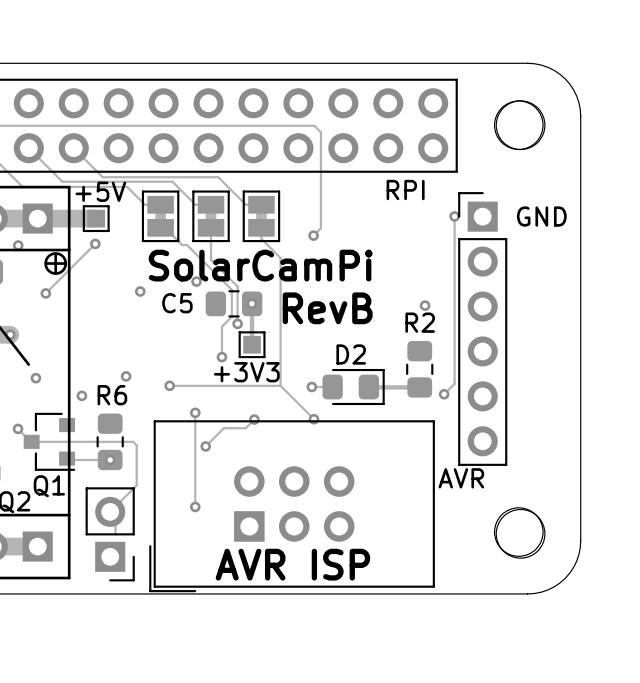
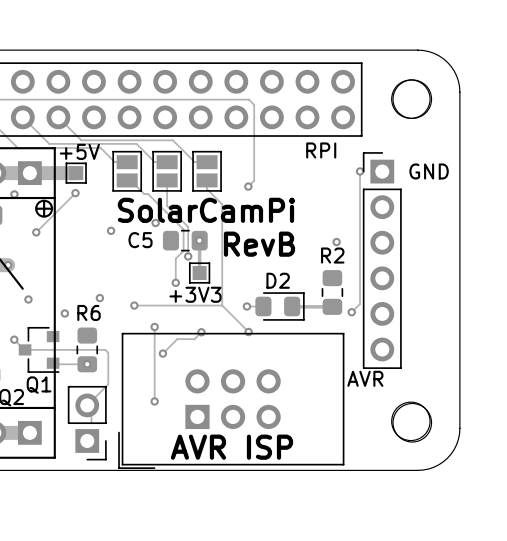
part footprint: [141, 190, 180, 243] -> [112, 150, 143, 192]
part footprint: [192, 190, 230, 243] -> [152, 150, 182, 192]
part footprint: [242, 190, 281, 243] -> [192, 150, 222, 192]

